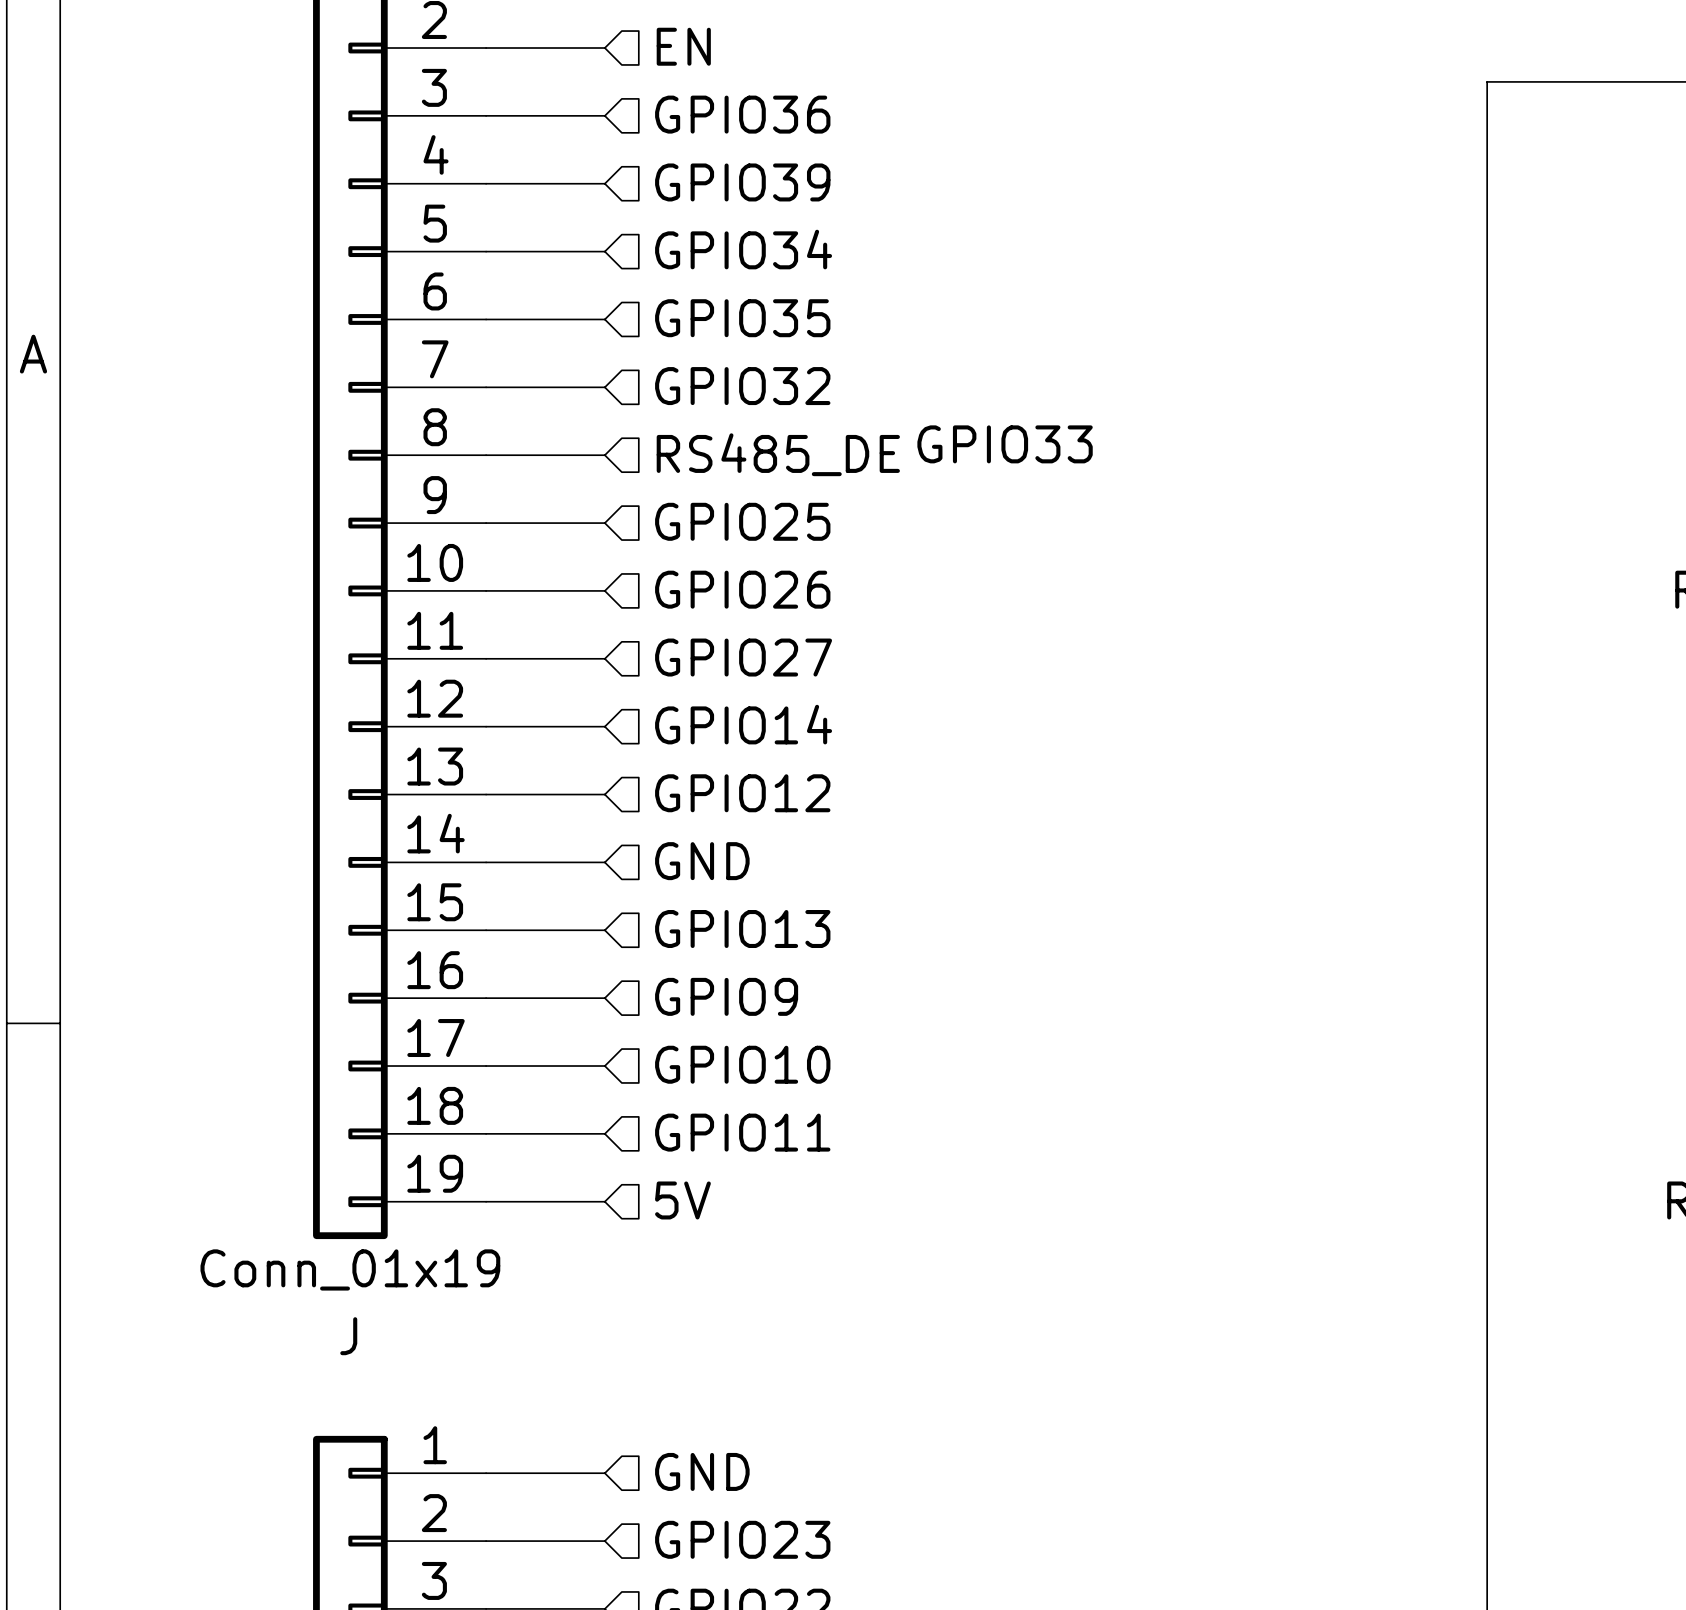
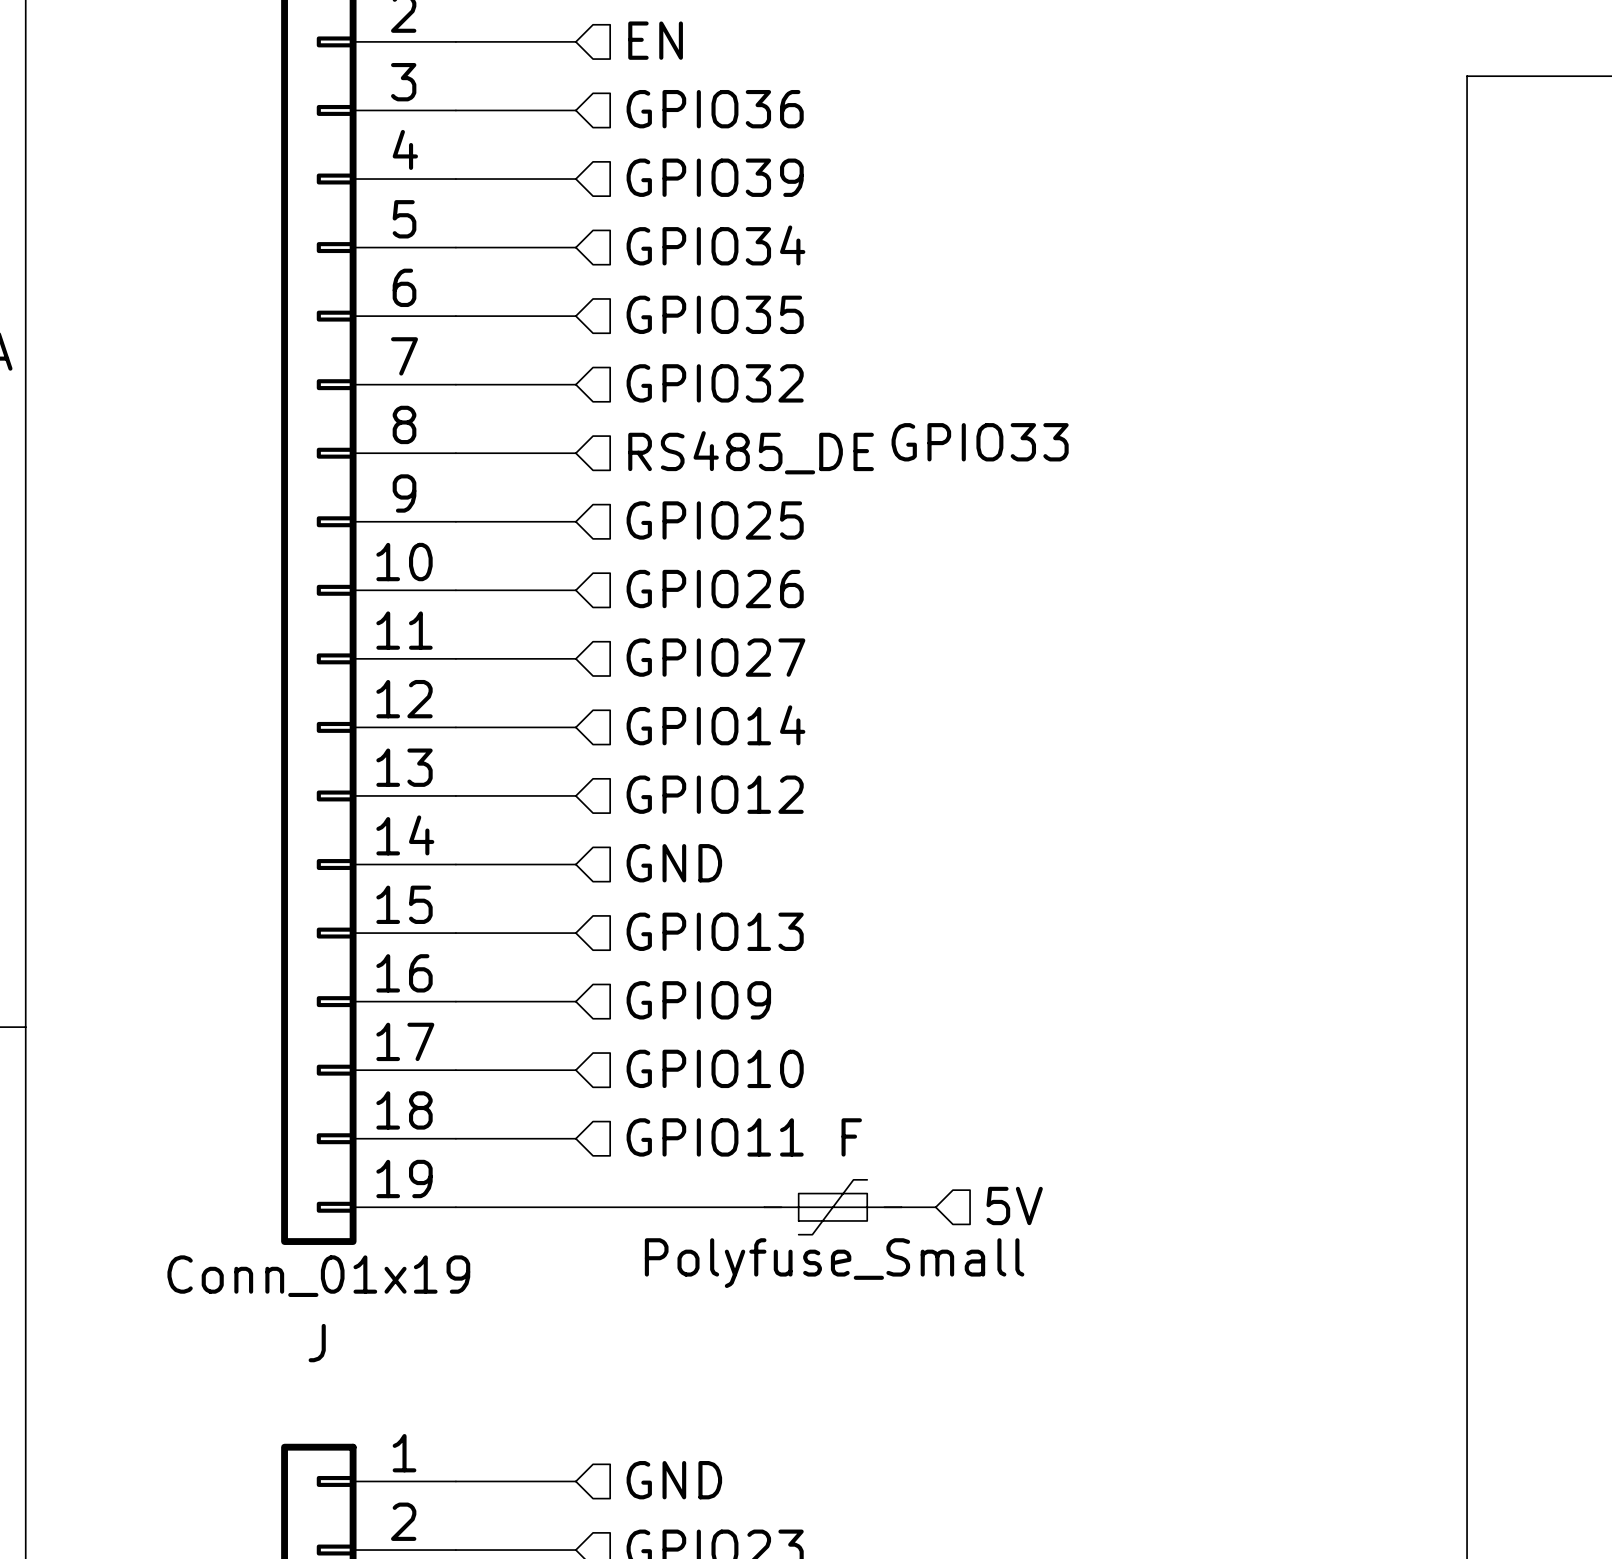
hierarchical label position: 5V (682, 1200) -> 5V (1014, 1205)
wire: none -> (575, 1207) (764, 1207)
F: none -> Polyfuse_Small (832, 1207)
wire: none -> (901, 1207) (935, 1207)

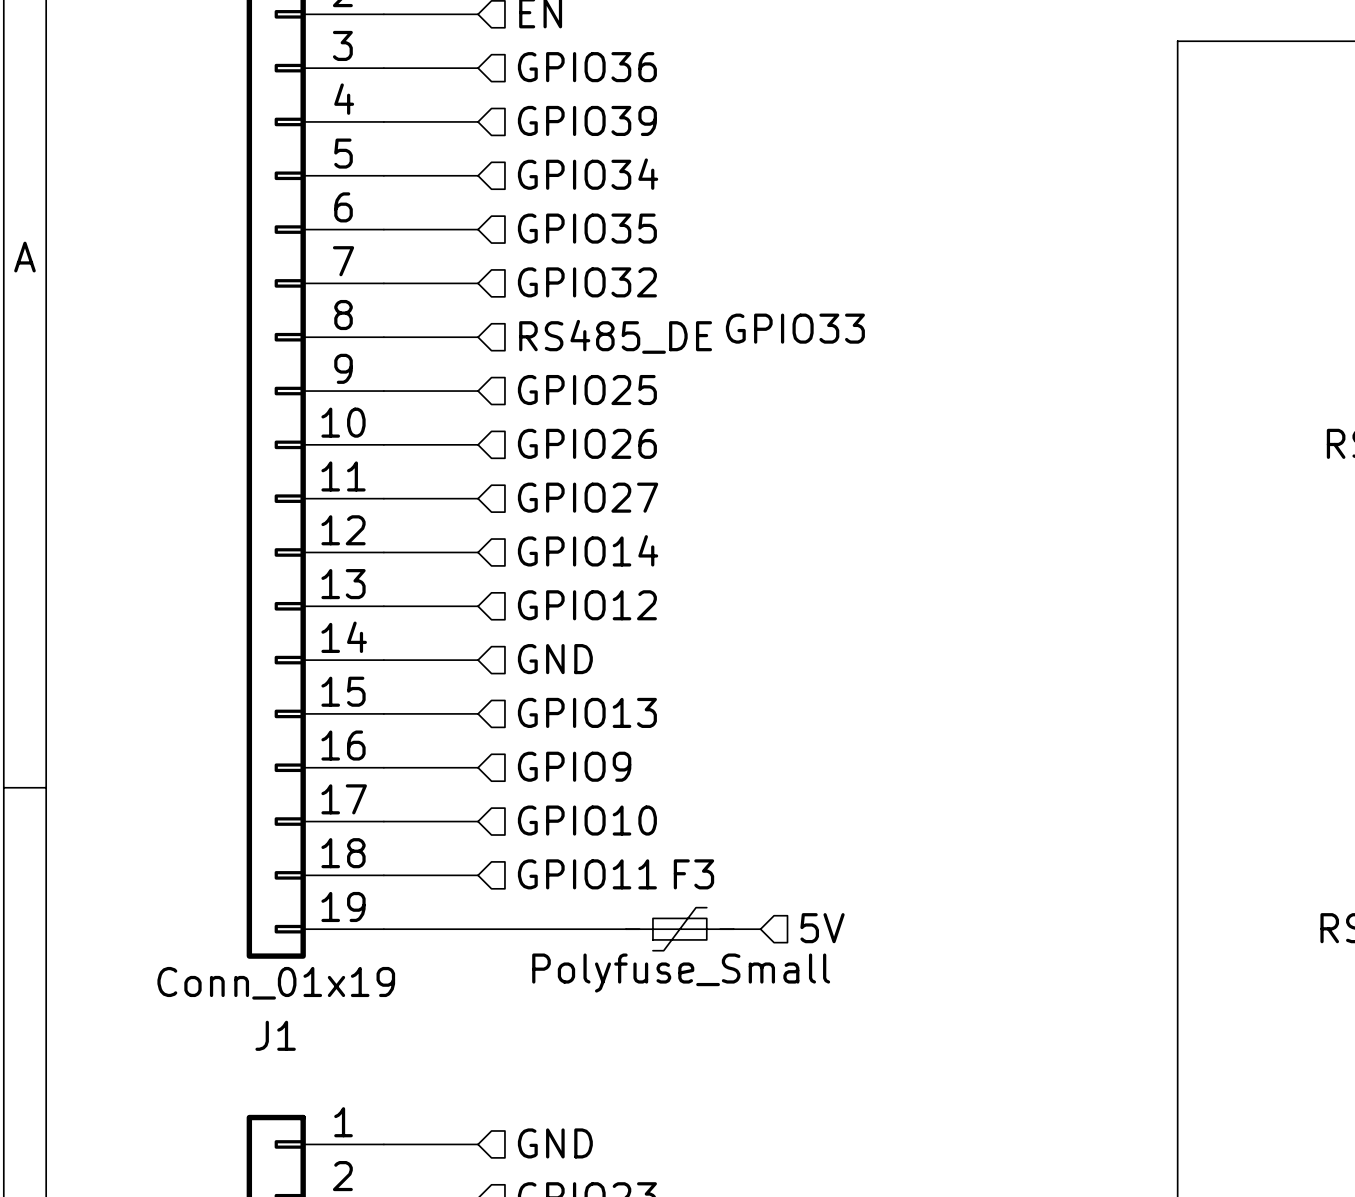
F name: F (851, 1137) -> F3 (693, 874)
J name: J (317, 1343) -> J1 (275, 1035)

